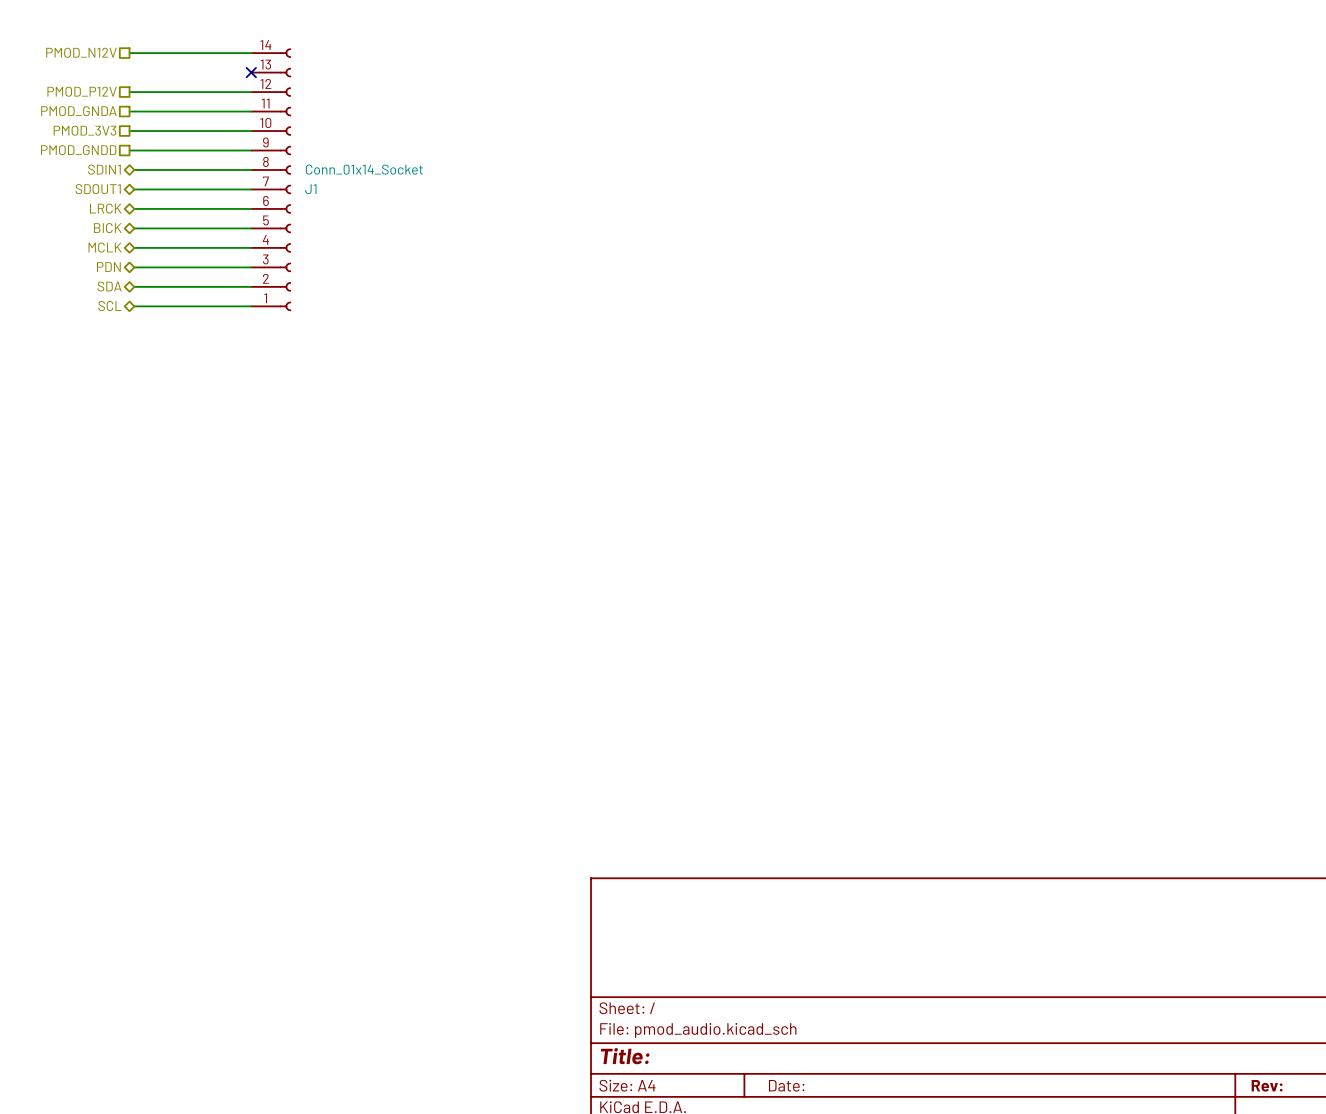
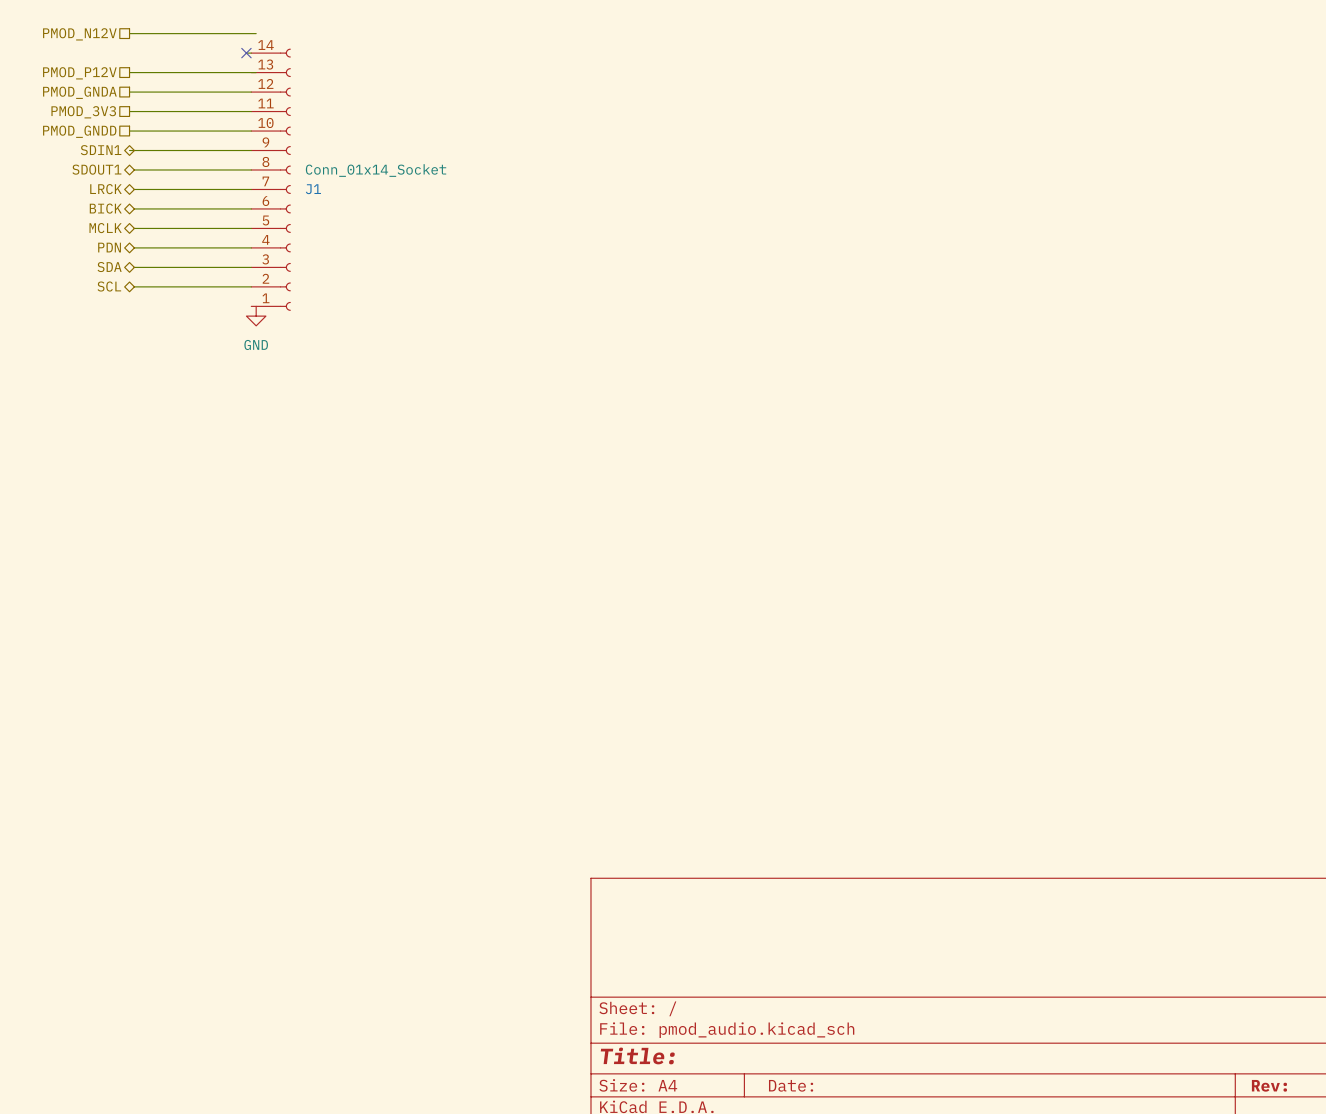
wire: none -> (129, 33) (256, 33)
hierarchical label position: PMOD_N12V (81, 52) -> PMOD_N12V (79, 34)
wire: (129, 53) (246, 53) -> none
hierarchical label: none -> PMOD_P12V (79, 73)
wire: none -> (129, 72) (256, 72)
no-connect mark position: (251, 72) -> (246, 53)
hierarchical label: PMOD_P12V (82, 91) -> PMOD_GNDA (79, 92)
hierarchical label: PMOD_GNDA (78, 111) -> PMOD_3V3 (83, 112)
hierarchical label: PMOD_3V3 (84, 130) -> PMOD_GNDD (79, 131)
hierarchical label shape: passive (78, 150) -> bidirectional (101, 150)
hierarchical label: PMOD_GNDD (78, 150) -> SDIN1 (101, 150)
hierarchical label: SDIN1 (104, 169) -> SDOUT1 (96, 169)
hierarchical label: SDOUT1 (98, 189) -> LRCK (105, 189)
hierarchical label: LRCK (105, 208) -> BICK (105, 208)
hierarchical label: BICK (107, 228) -> MCLK (105, 228)
hierarchical label: MCLK (105, 247) -> PDN (109, 247)
hierarchical label: PDN (108, 267) -> SDA (109, 267)
hierarchical label: SDA (109, 286) -> SCL (109, 286)
hierarchical label: SCL (109, 306) -> none
wire: (134, 306) (251, 306) -> none
power symbol: none -> GND (256, 316)

